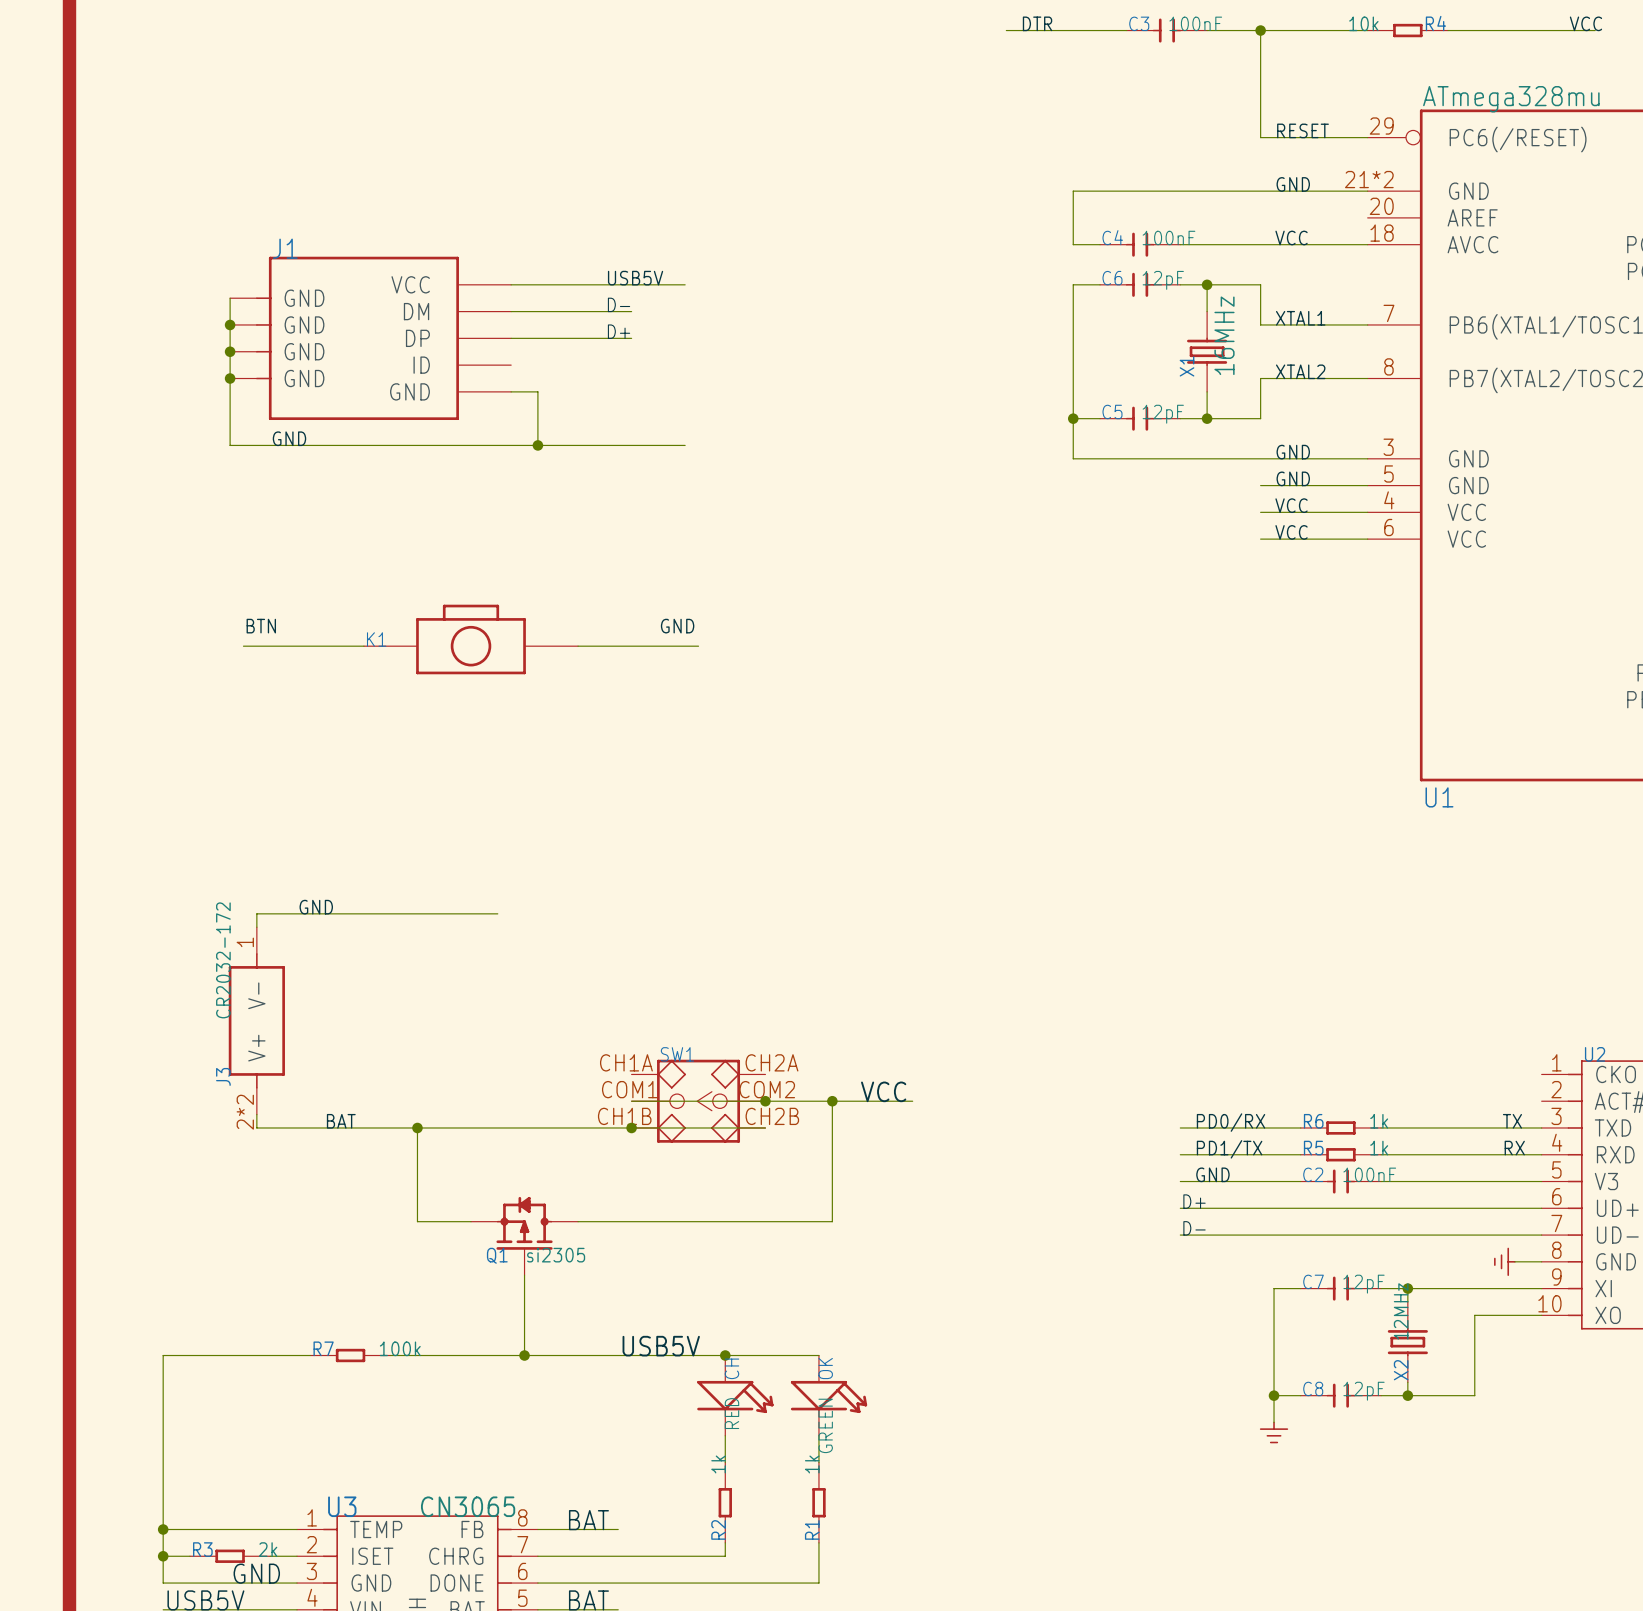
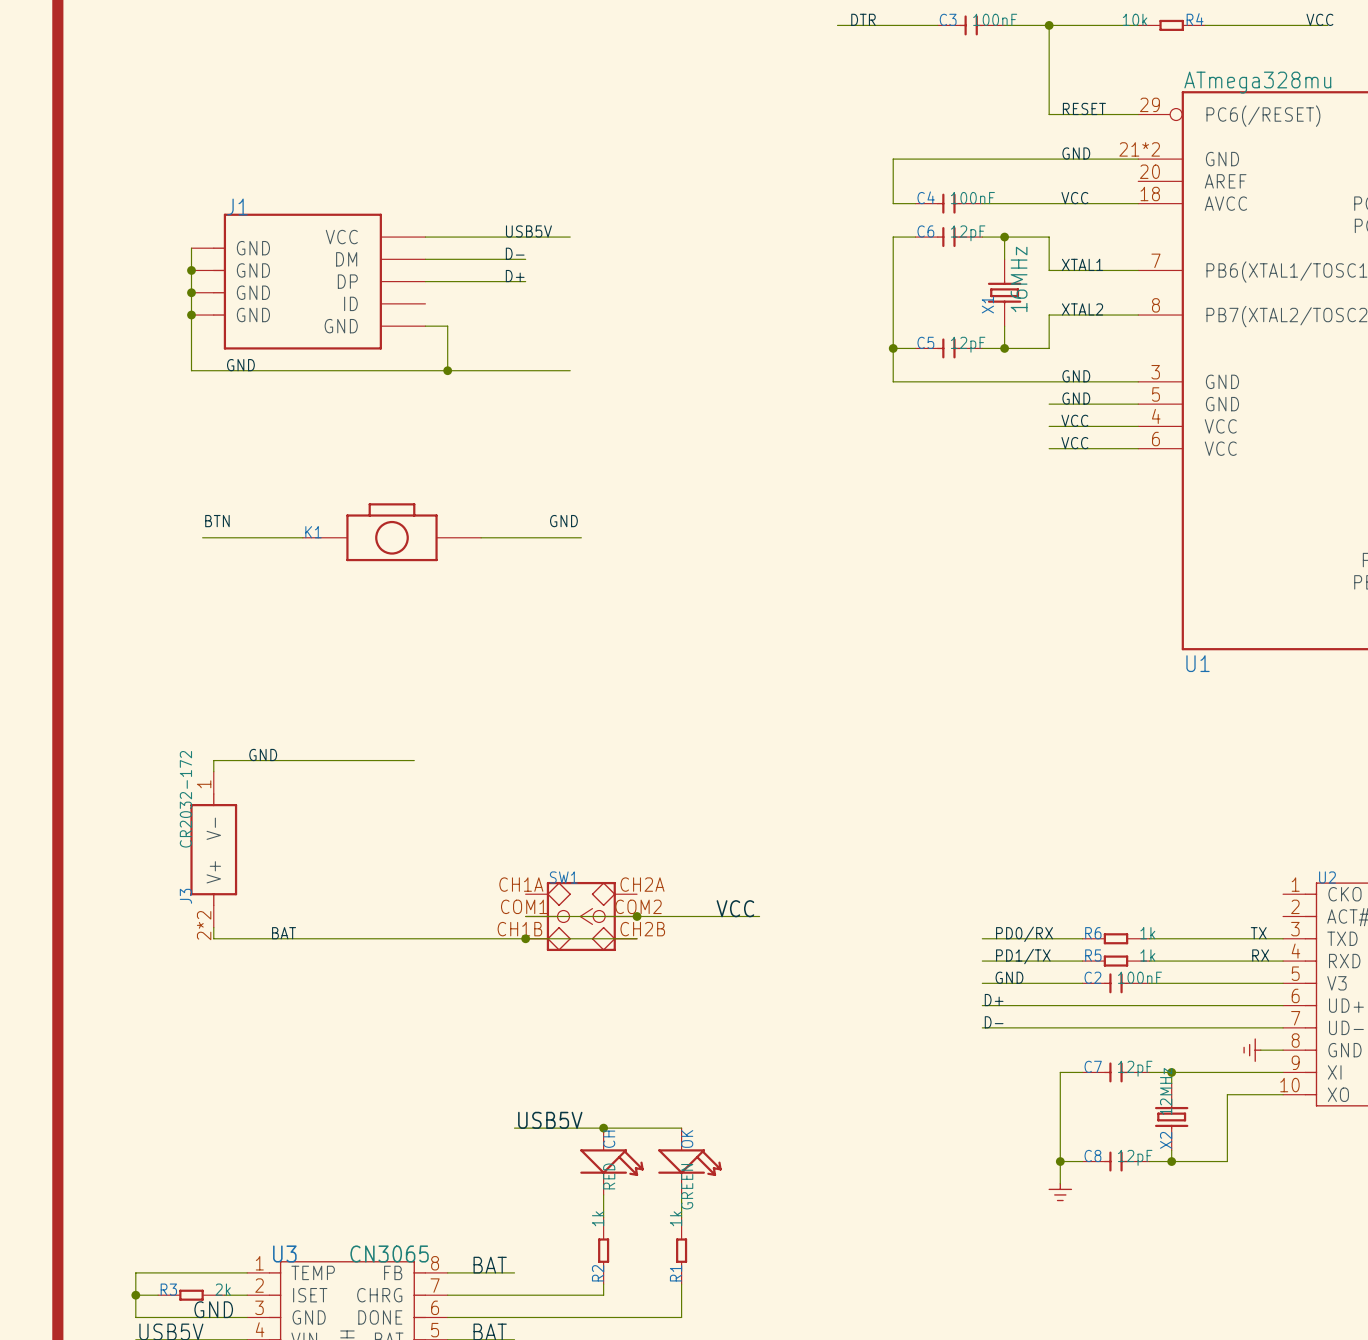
wire: (832, 1101) (832, 1221) (578, 1221) -> none
junction: (832, 1101) -> none
wire: (417, 1127) (417, 1221) (471, 1221) -> none
junction: (417, 1127) -> none
Q1: si2305 (524, 1236) -> none
wire: (524, 1275) (524, 1355) -> none
wire: (310, 1355) (163, 1355) (163, 1529) -> none
R7: 100k (350, 1355) -> none
wire: (390, 1355) (618, 1355) -> none
junction: (524, 1355) -> none
junction: (163, 1529) -> none

